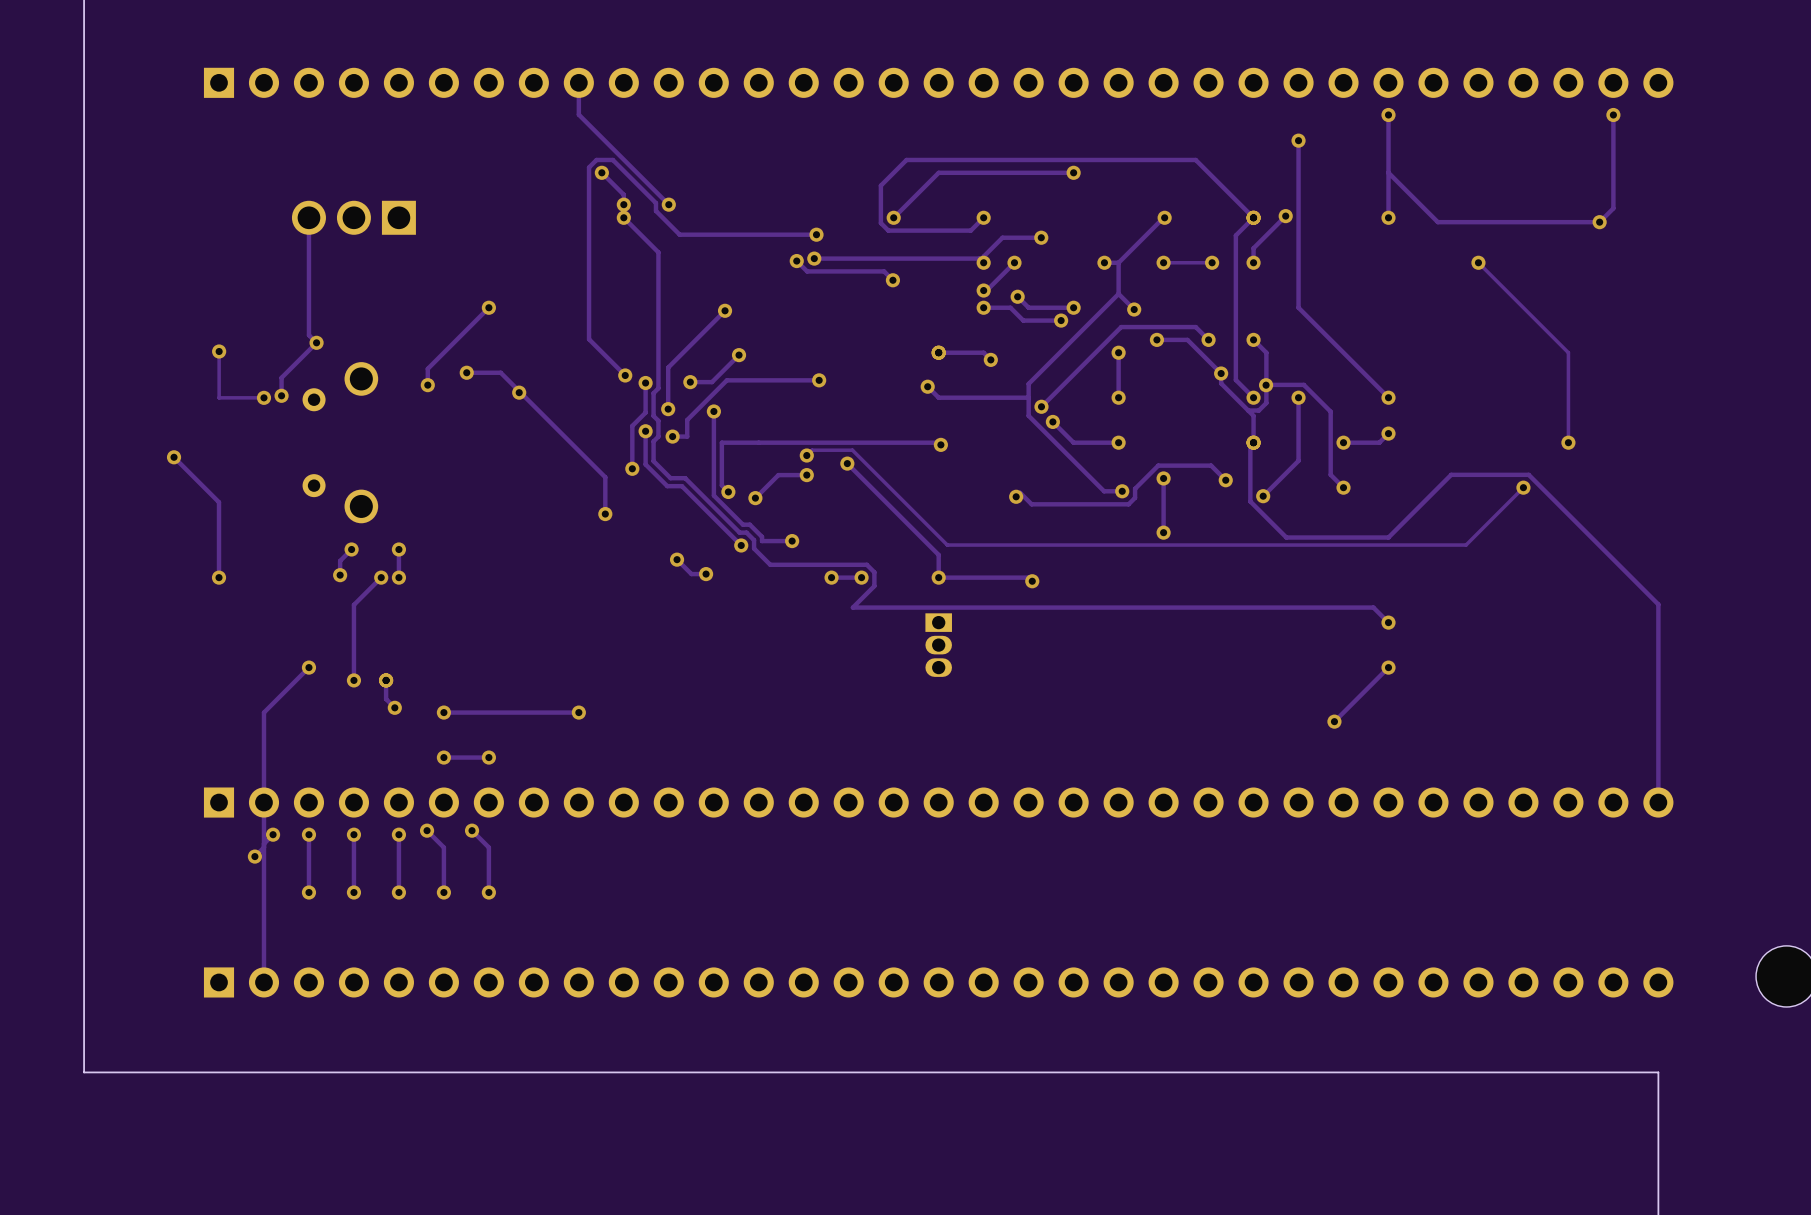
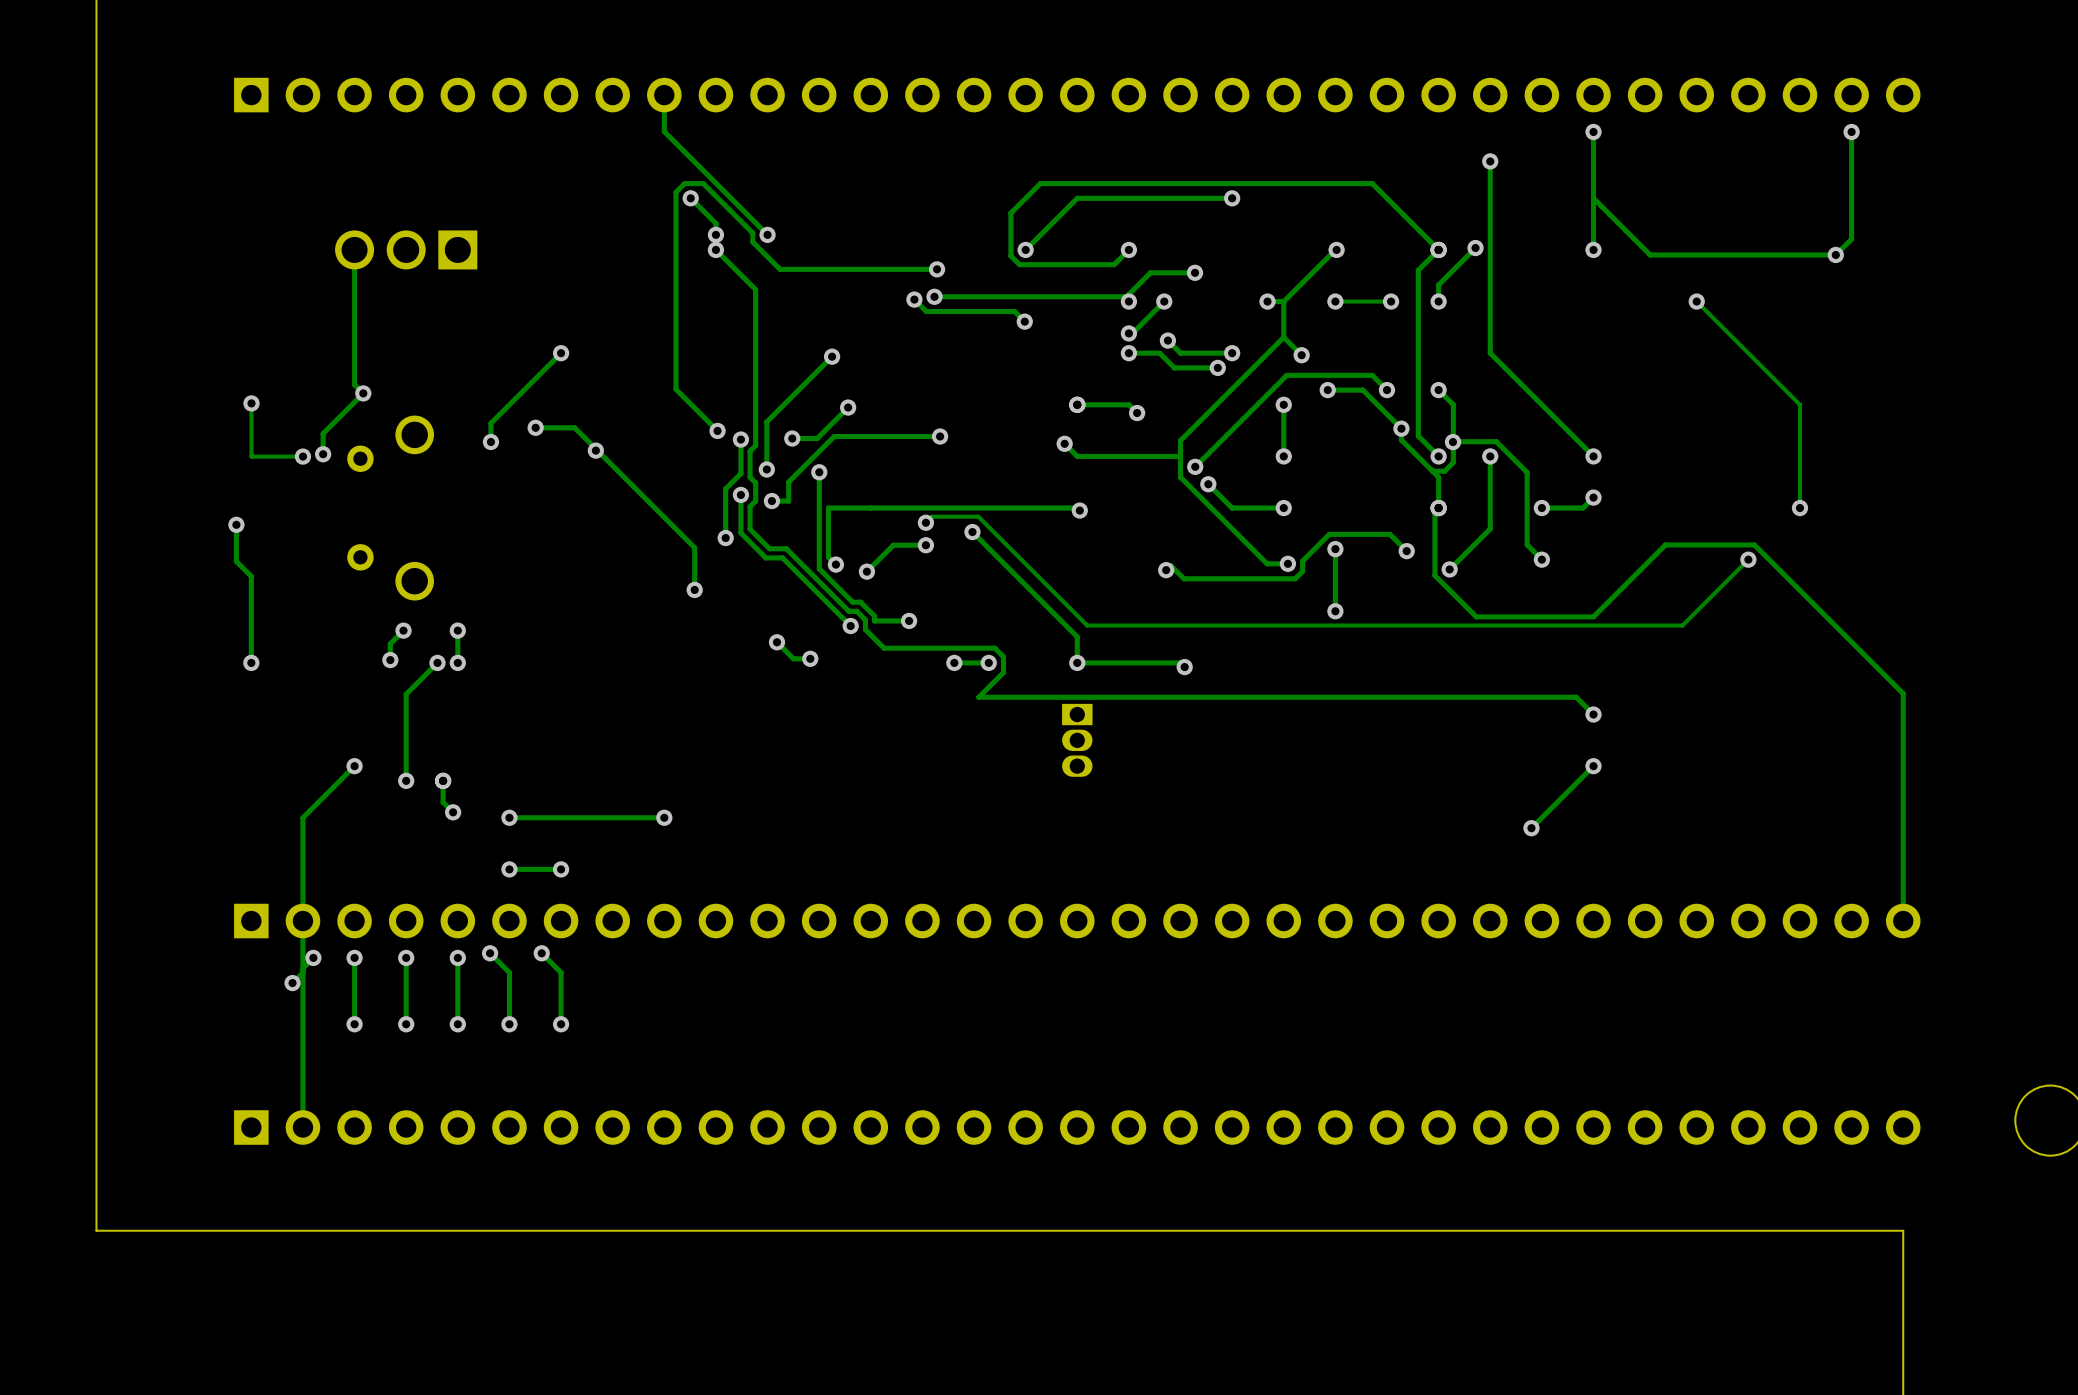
track: (174, 457) (205, 489) -> (236, 524) (236, 561)
via position: (174, 457) -> (236, 524)

